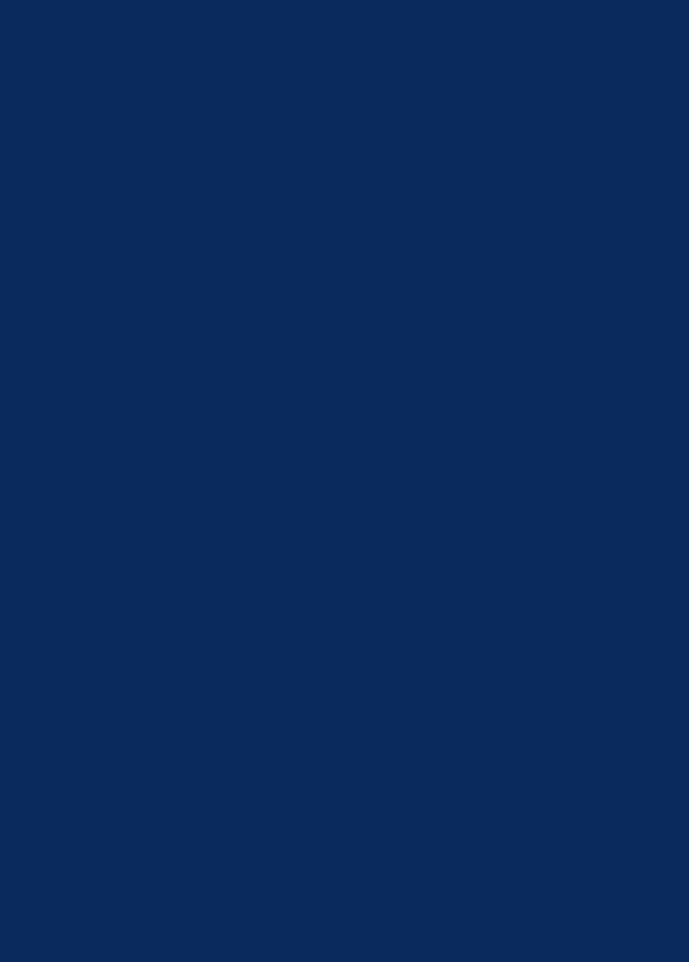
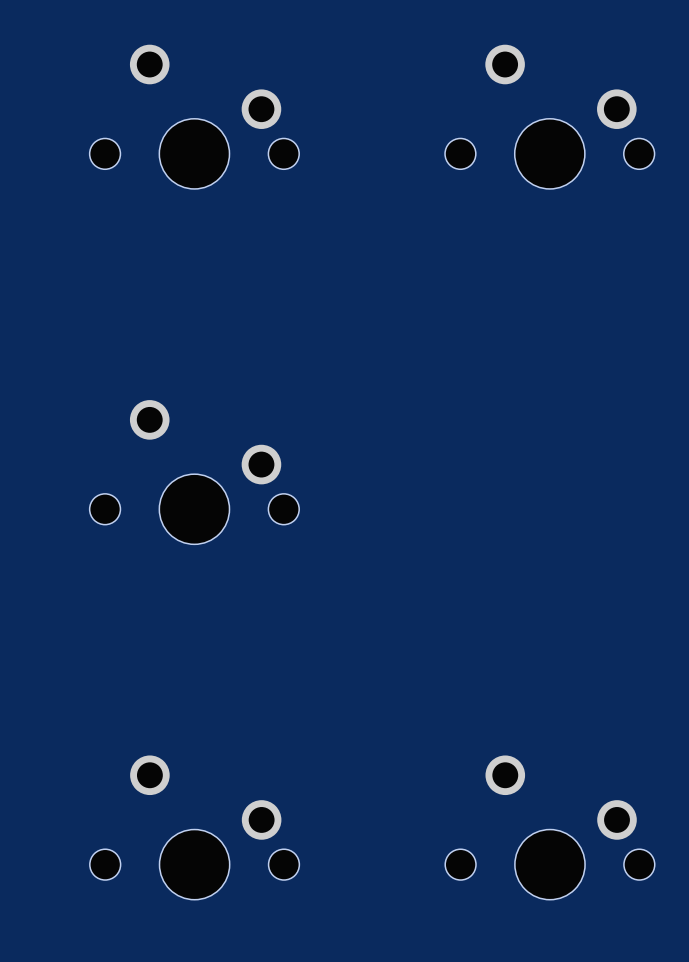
part: none -> (194, 116)
part: none -> (549, 116)
part: none -> (194, 472)
part: none -> (194, 827)
part: none -> (549, 827)

